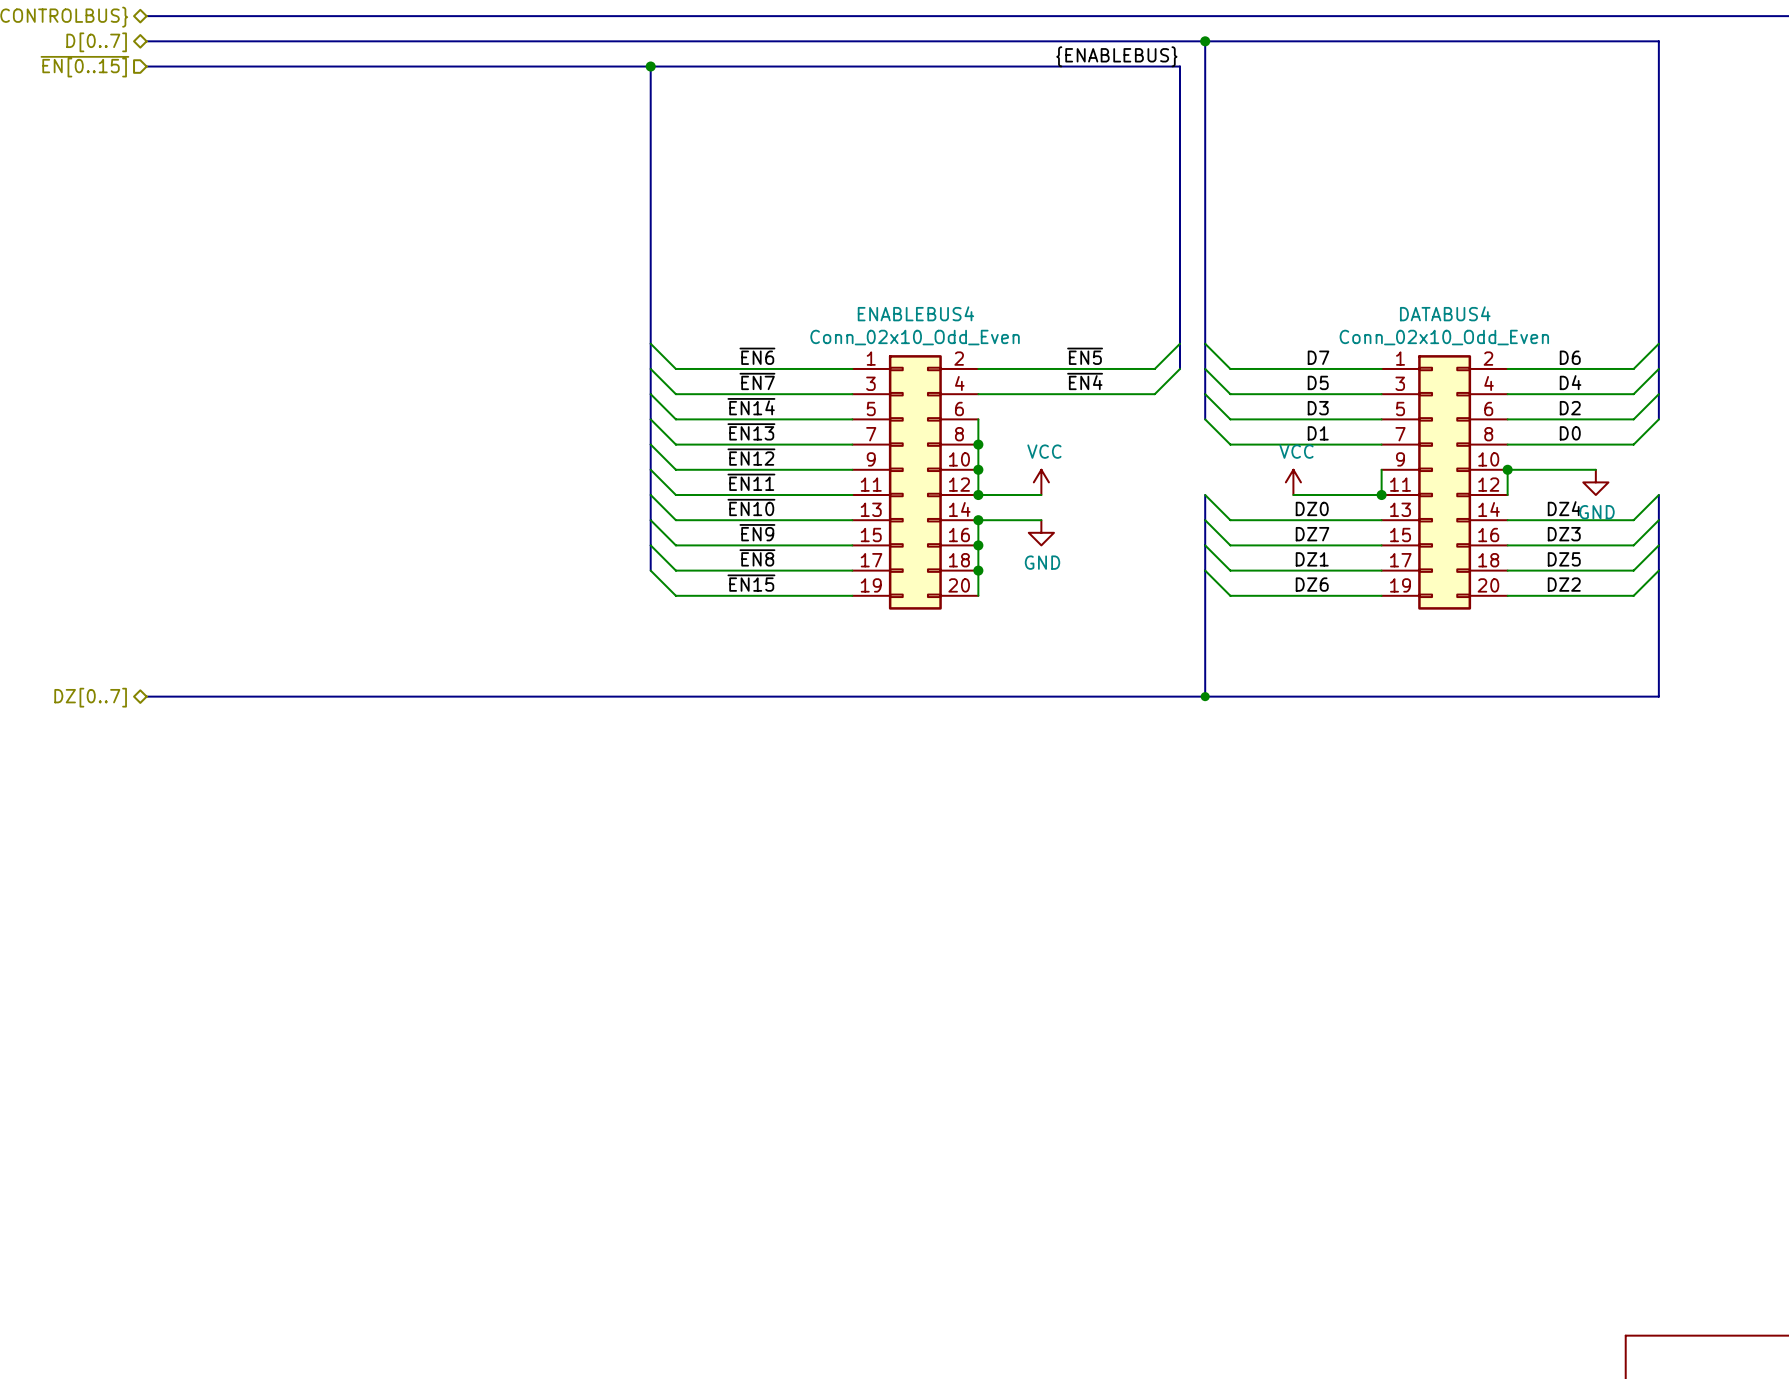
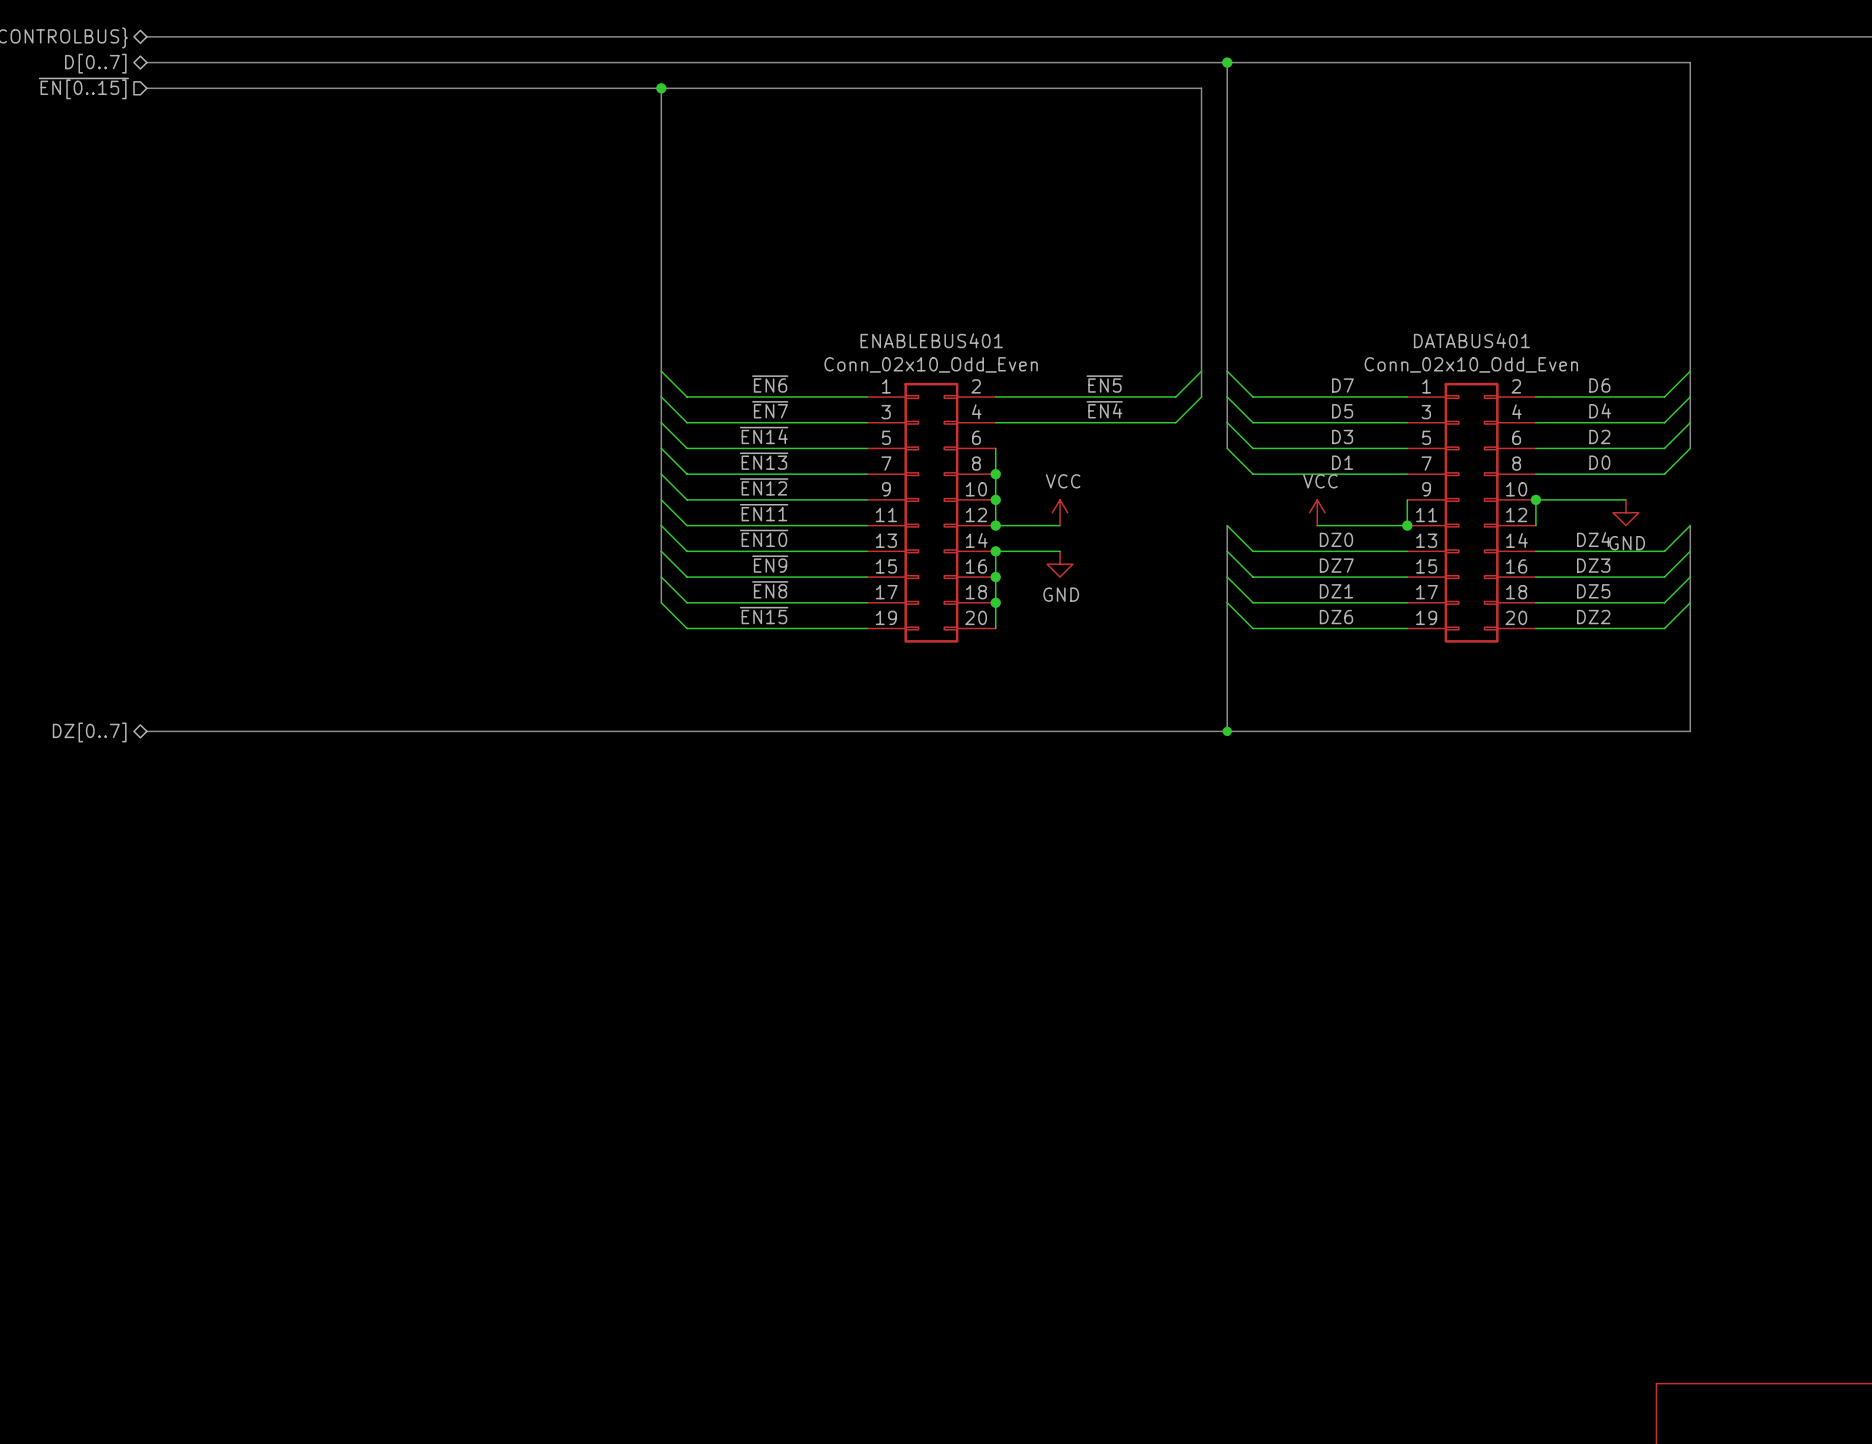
label: {ENABLEBUS} (1116, 56) -> none
ENABLEBUS4 name: ENABLEBUS4 (915, 313) -> ENABLEBUS401 (931, 340)
DATABUS4 name: DATABUS4 (1445, 313) -> DATABUS401 (1471, 340)

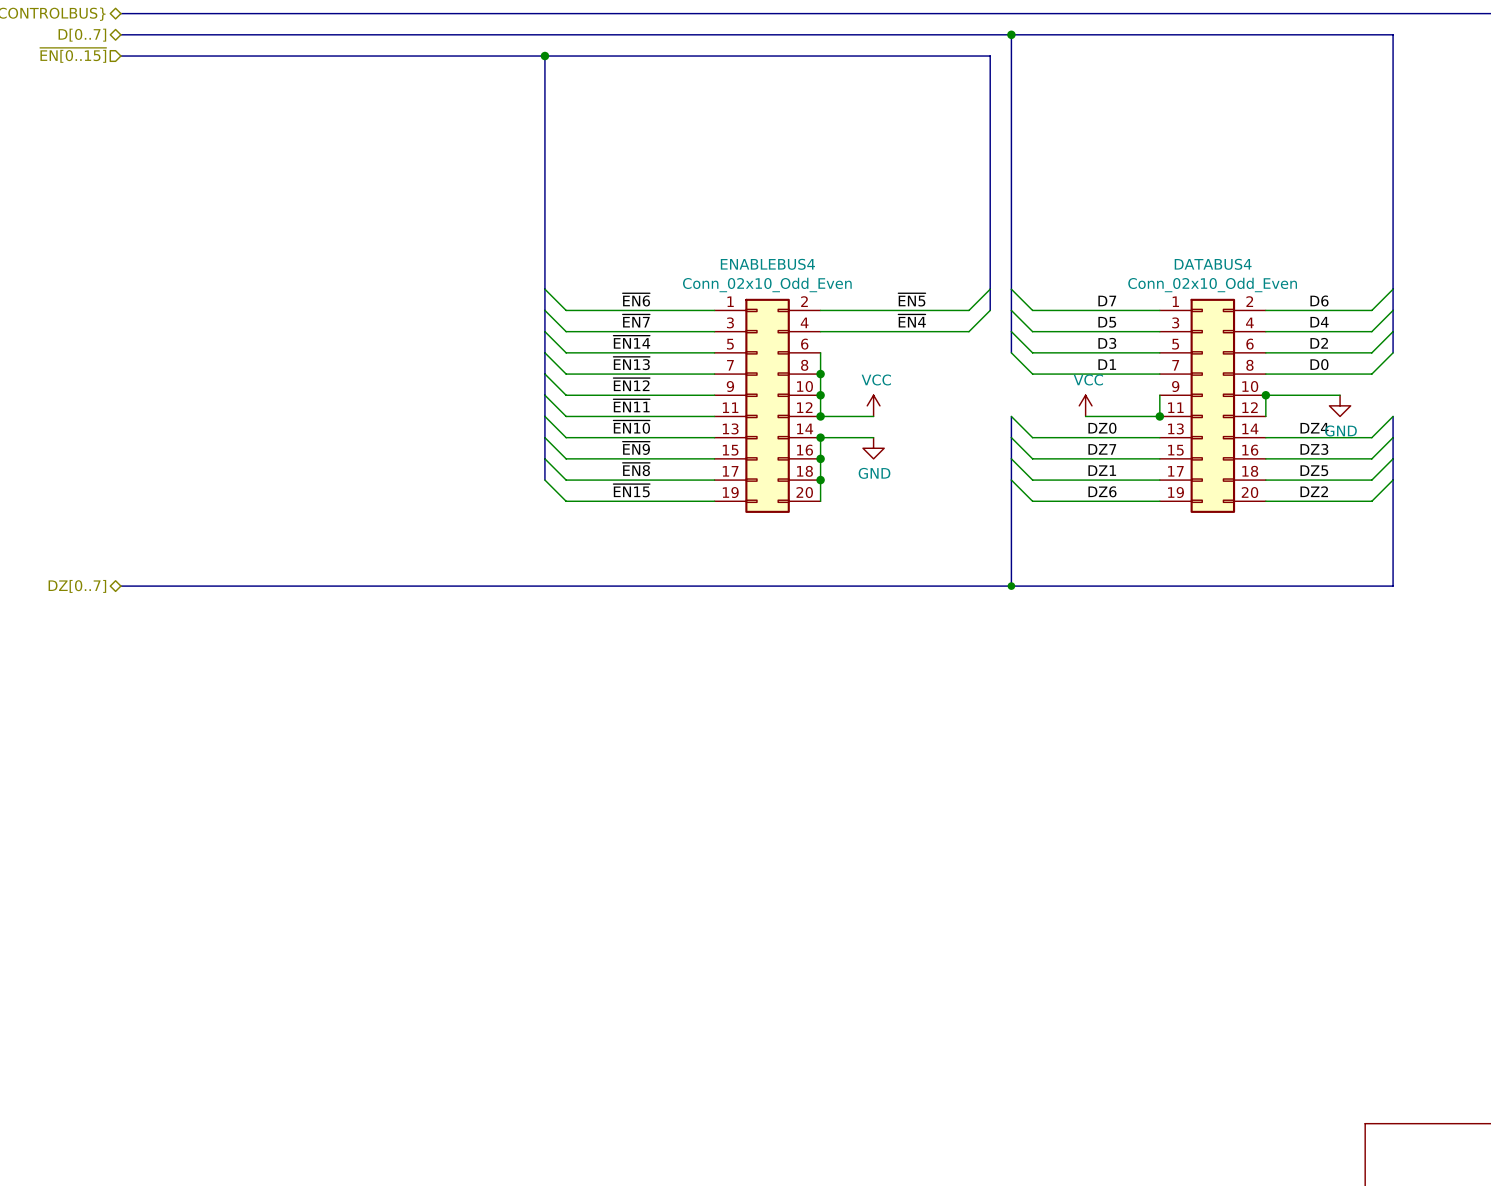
ENABLEBUS401 name: ENABLEBUS401 (931, 340) -> ENABLEBUS4 (767, 264)
DATABUS401 name: DATABUS401 (1471, 340) -> DATABUS4 (1213, 264)

